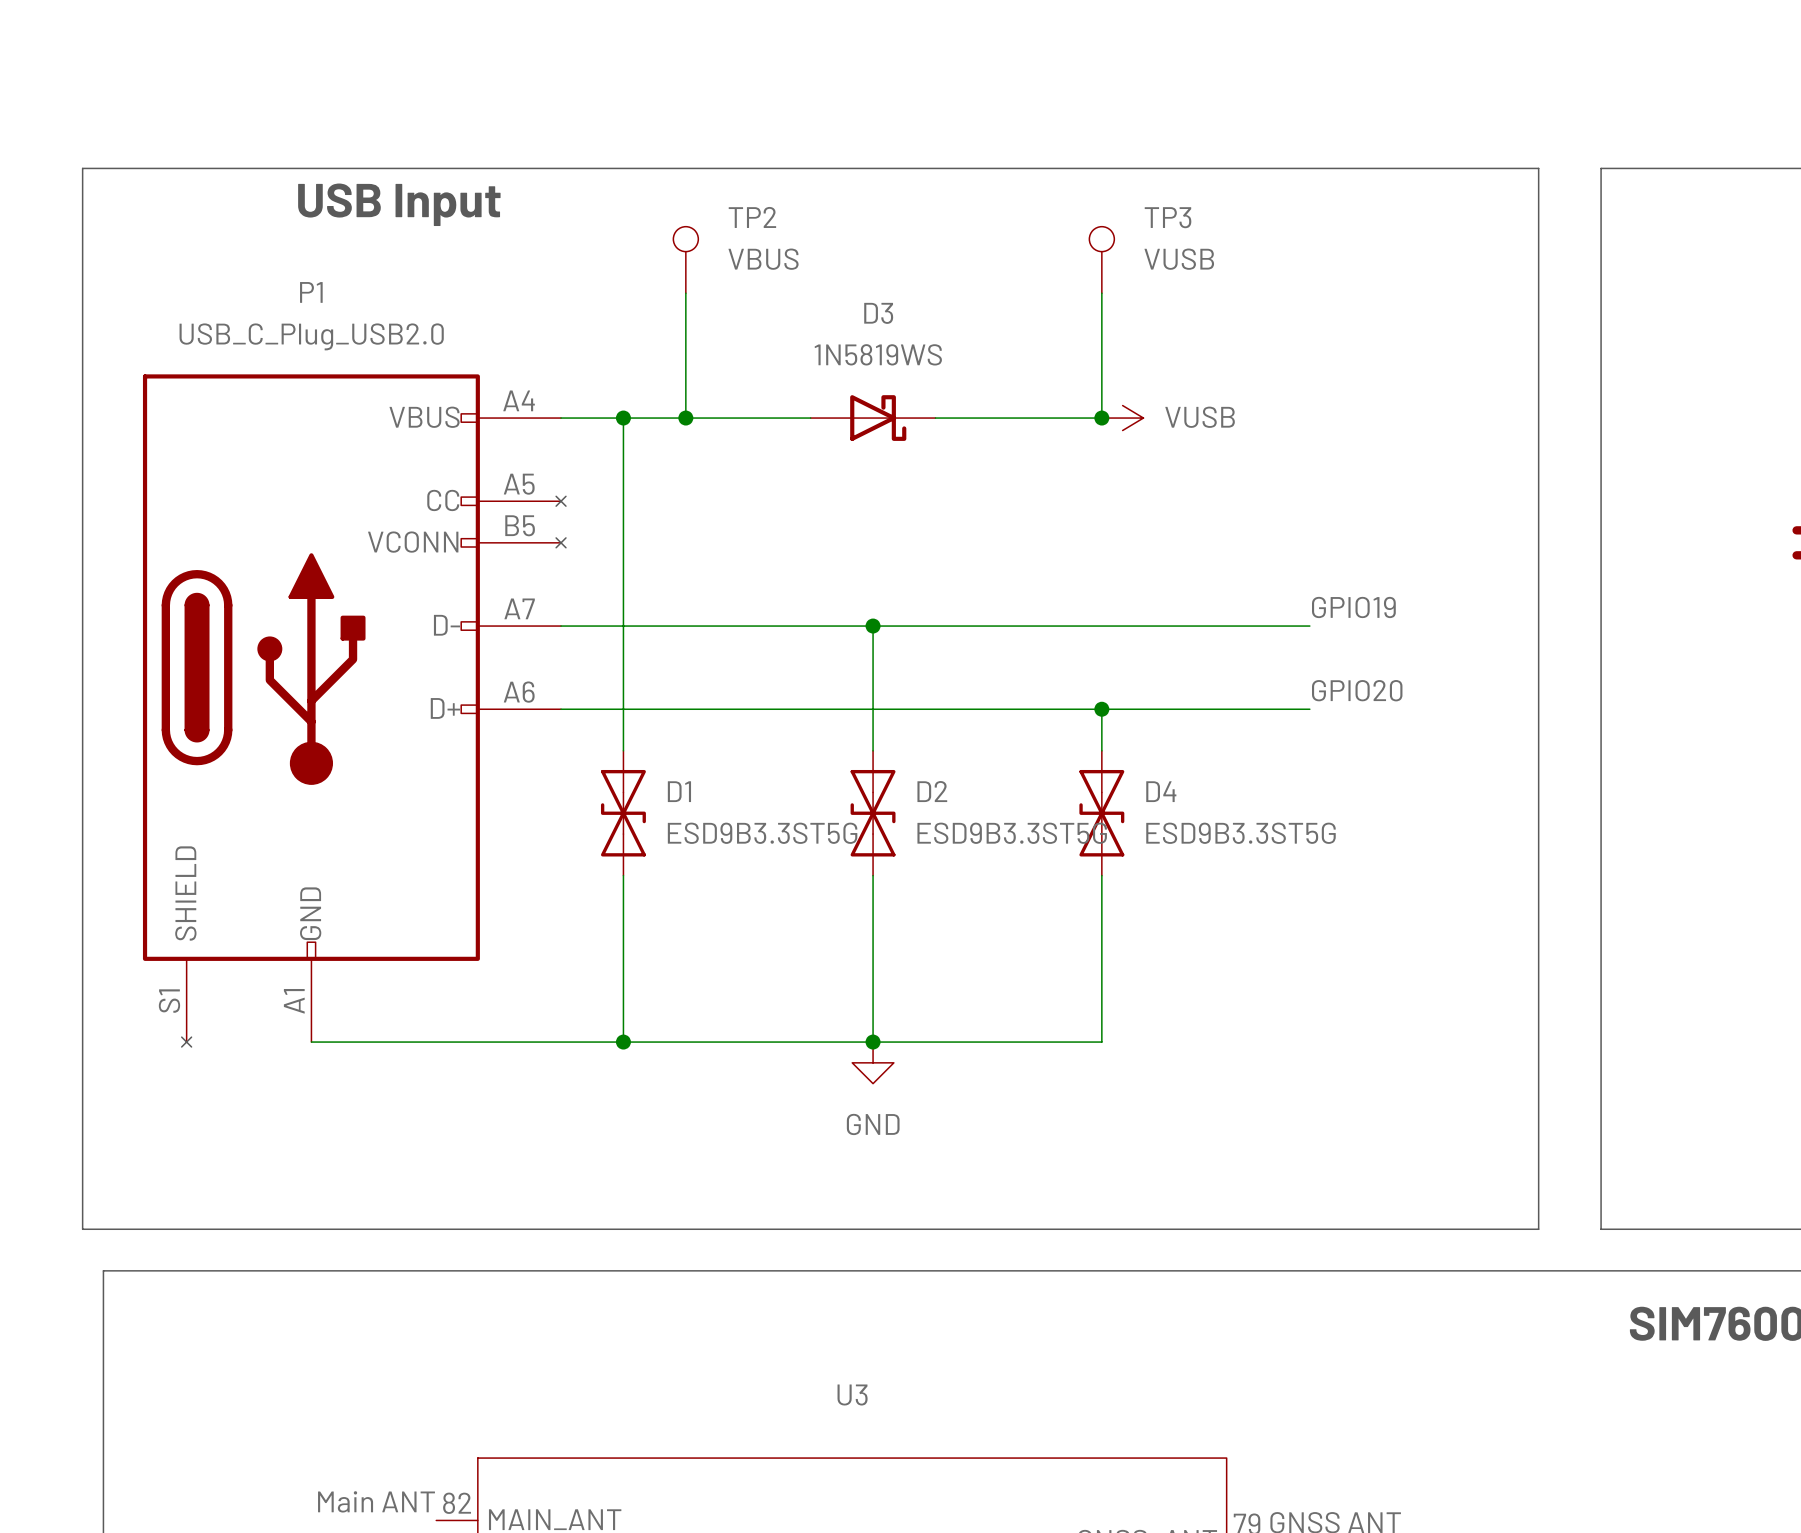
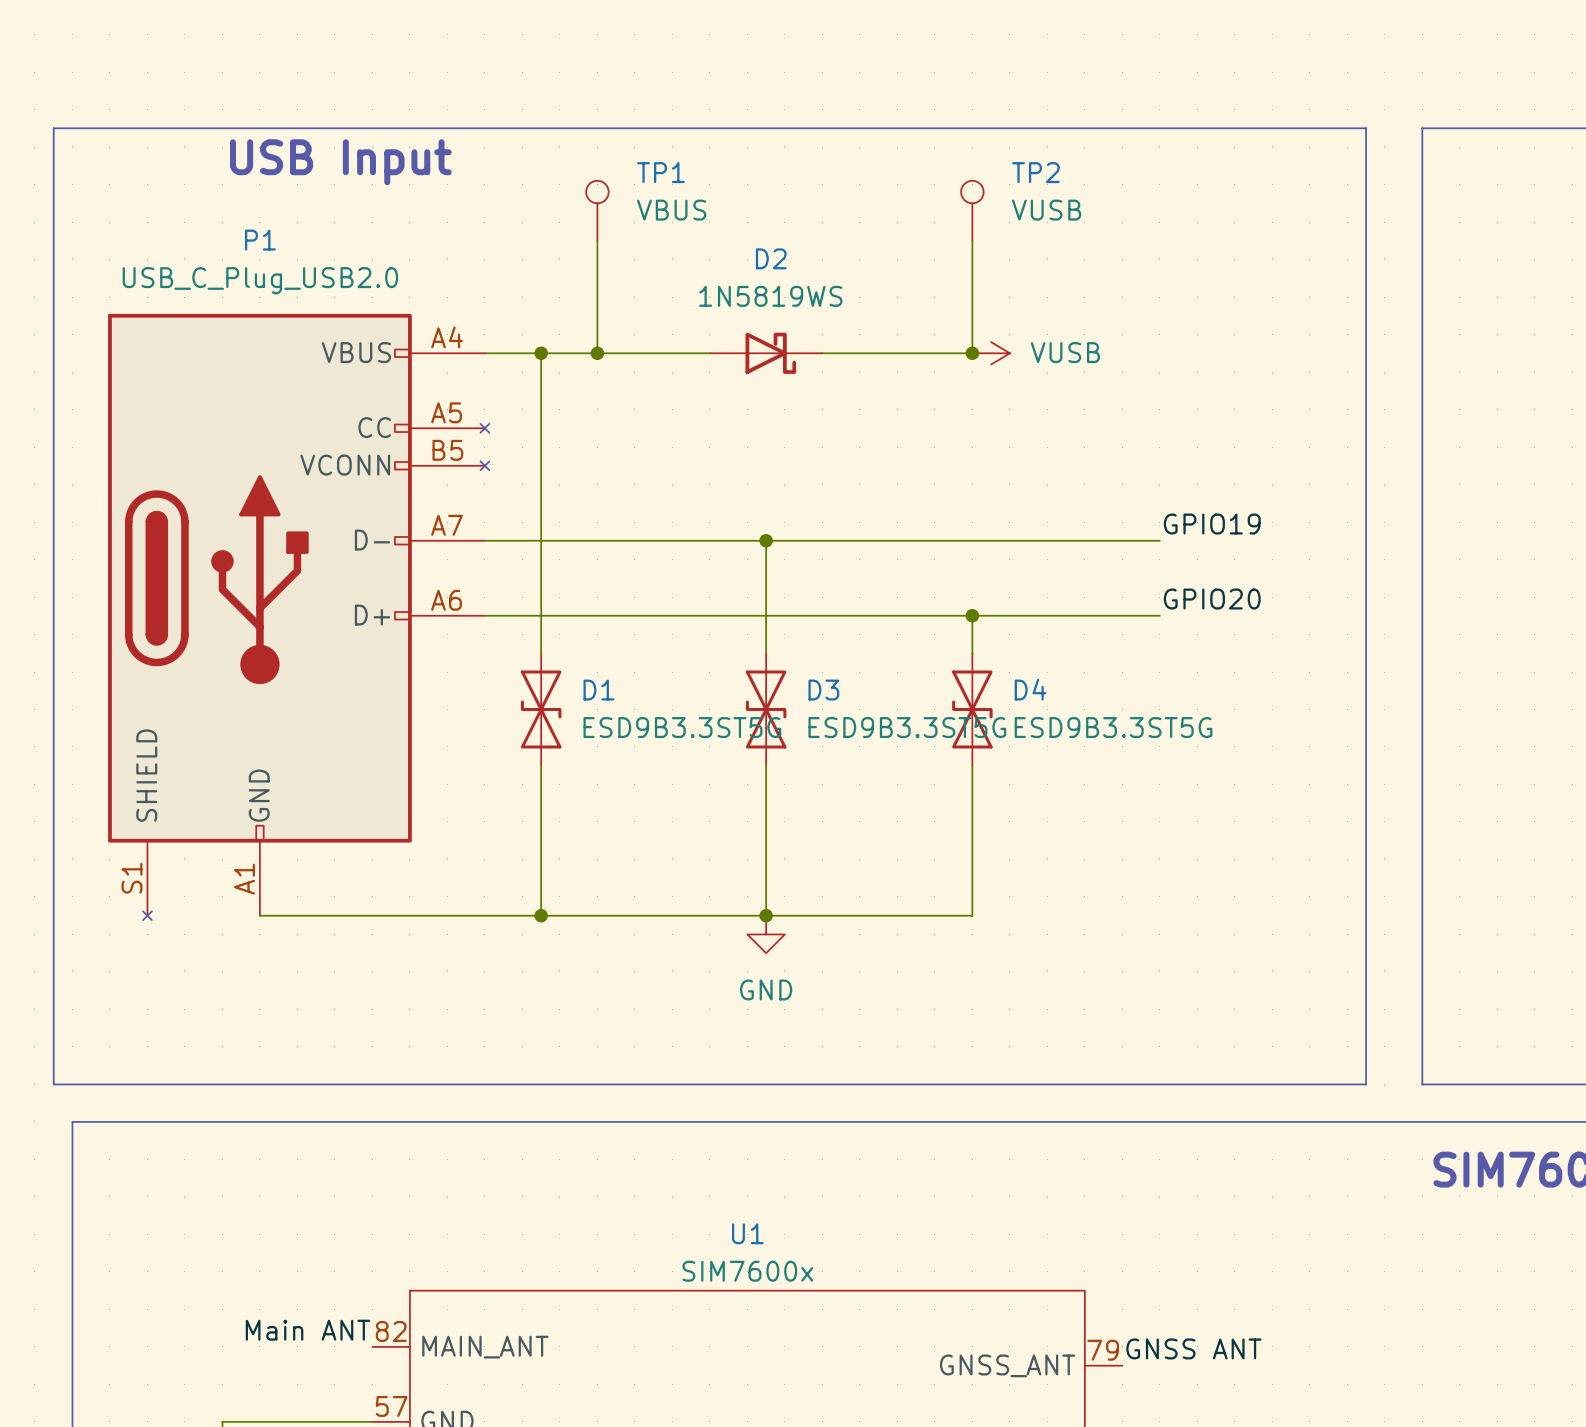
TP2 name: TP2 (752, 217) -> TP1 (660, 172)
TP3 name: TP3 (1168, 217) -> TP2 (1035, 172)
D3 name: D3 (878, 313) -> D2 (771, 258)
D2 name: D2 (932, 791) -> D3 (823, 690)
U3 name: U3 (852, 1394) -> U1 (747, 1233)
U3 value: none -> SIM7600x (747, 1271)

